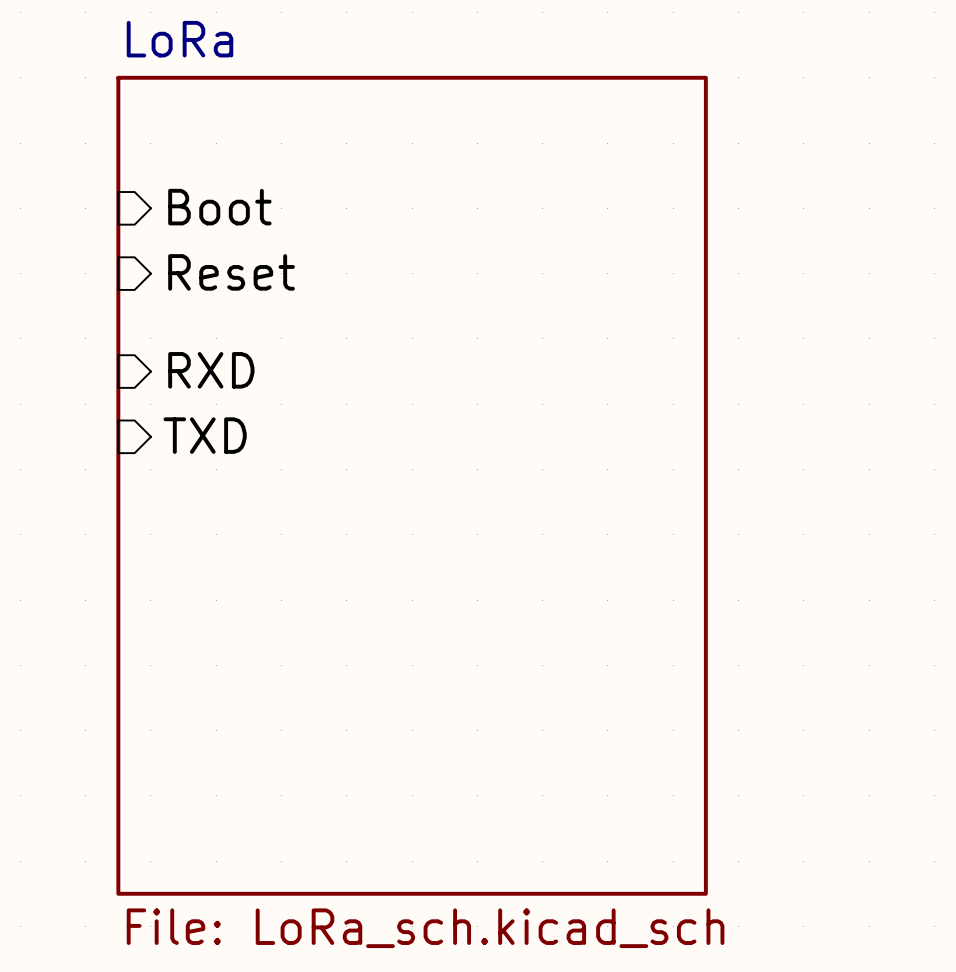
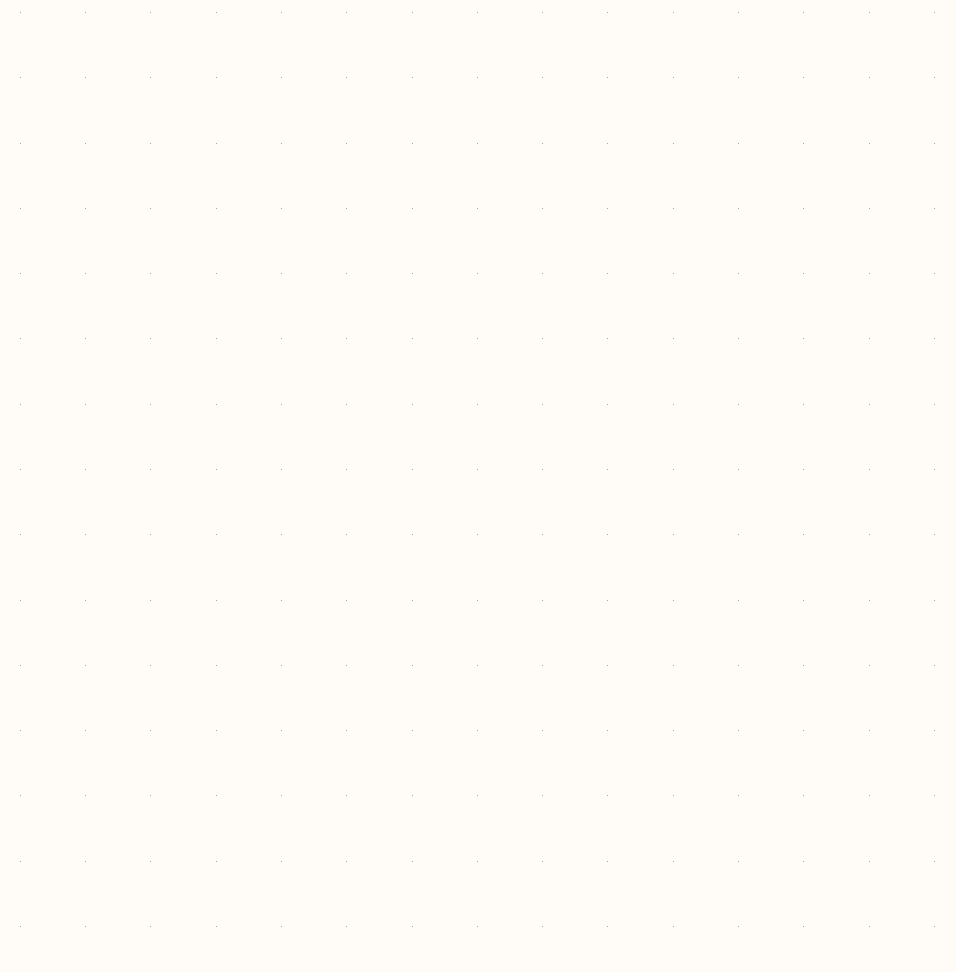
sheet pin: Boot (219, 207) -> none
sheet pin: Reset (231, 272) -> none
sheet pin: RXD (211, 370) -> none
sheet pin: TXD (205, 435) -> none
sheet LoRa: File: LoRa_sch.kicad_sch (412, 485) -> none

